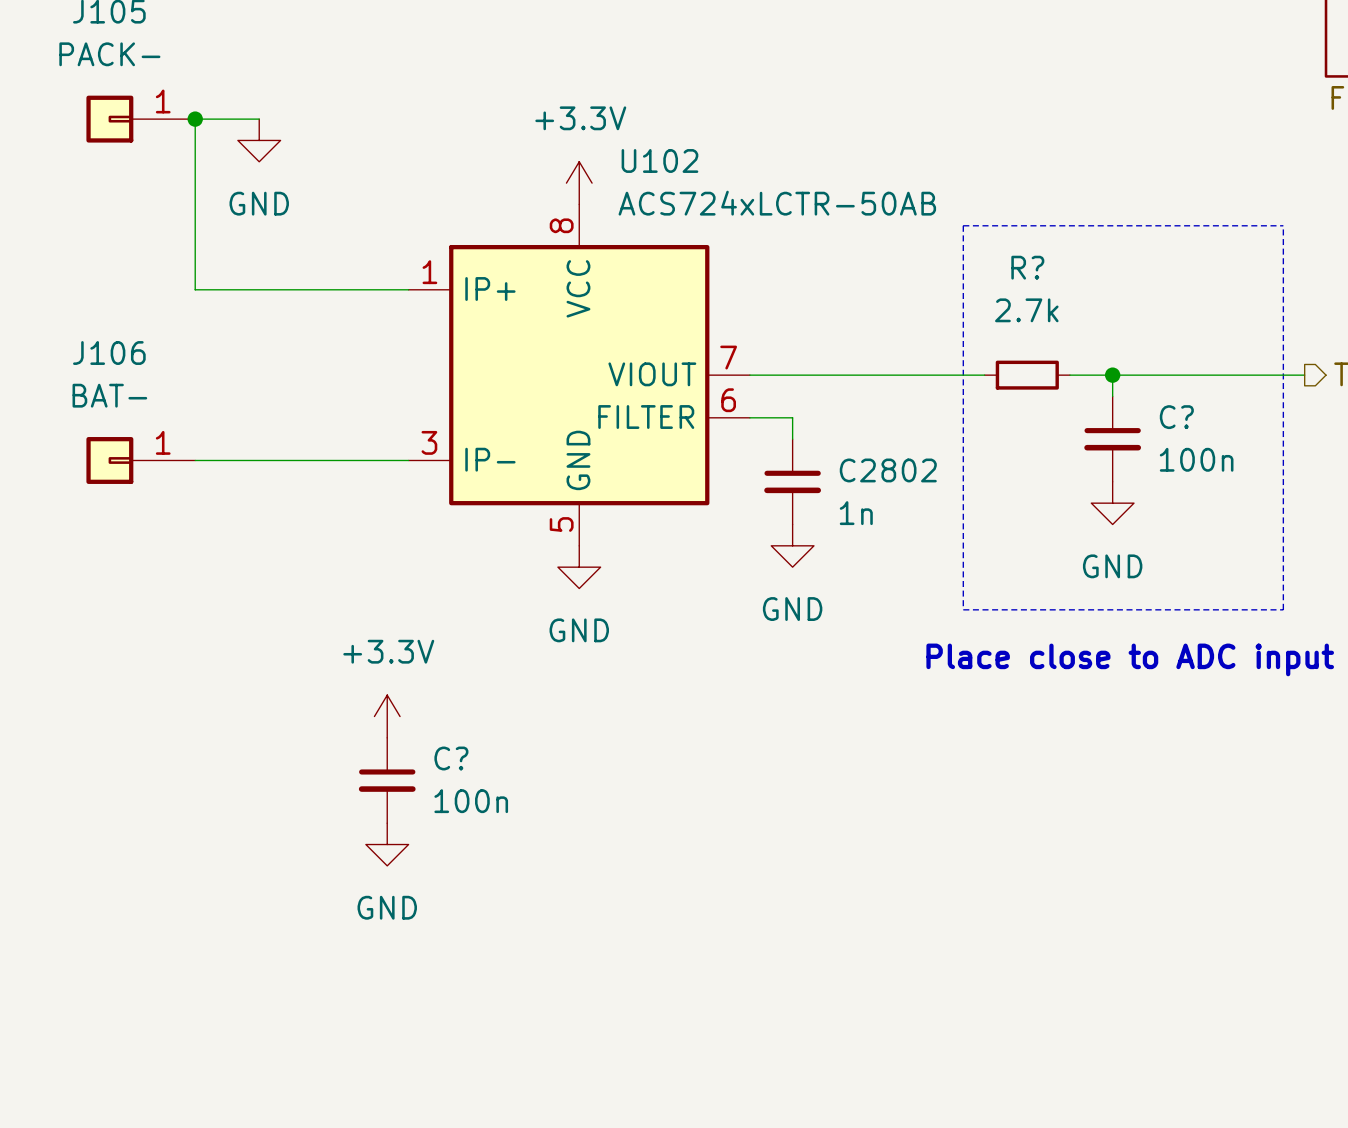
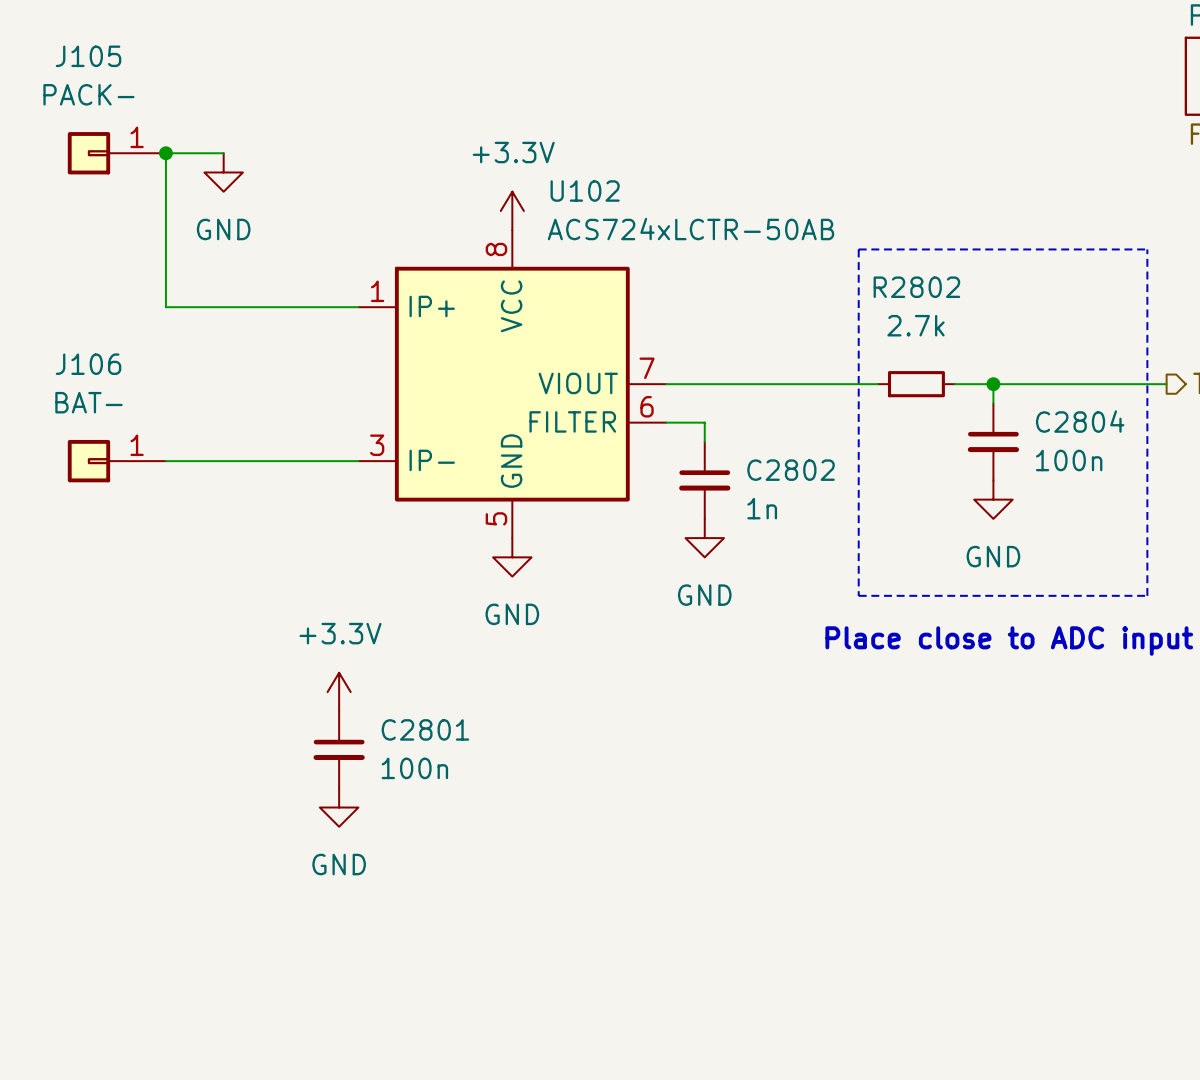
R? name: R? (1027, 267) -> R2802 (916, 287)
C? name: C? (1176, 417) -> C2804 (1080, 421)
C? name: C? (451, 758) -> C2801 (425, 729)

